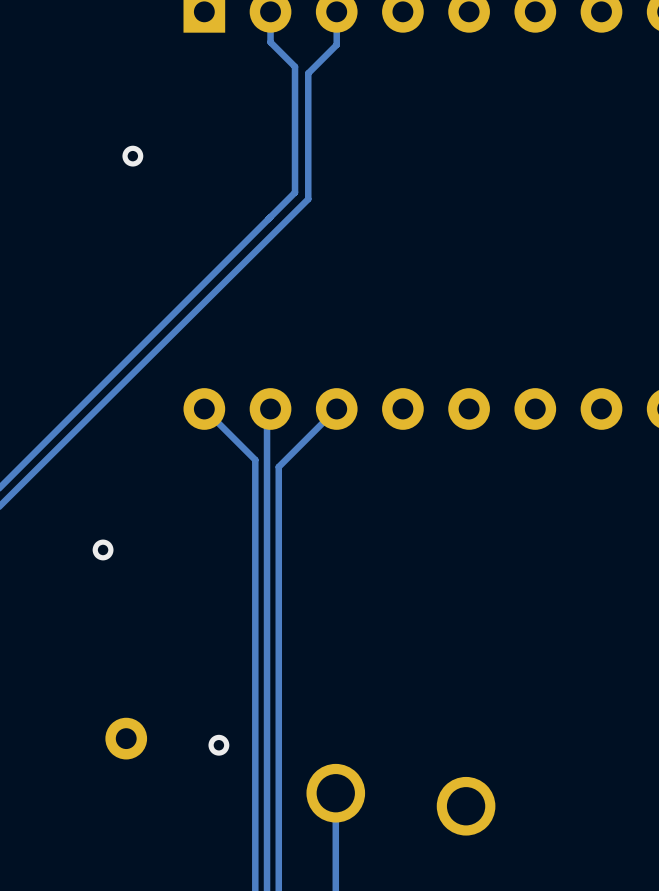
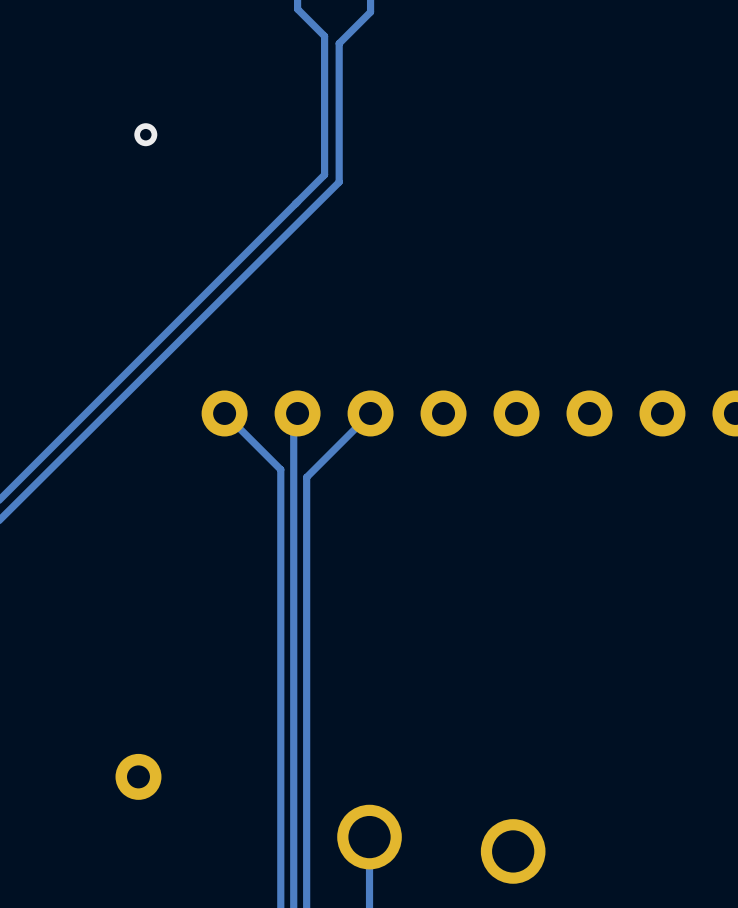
via: (103, 549) -> none
via: (218, 745) -> none

